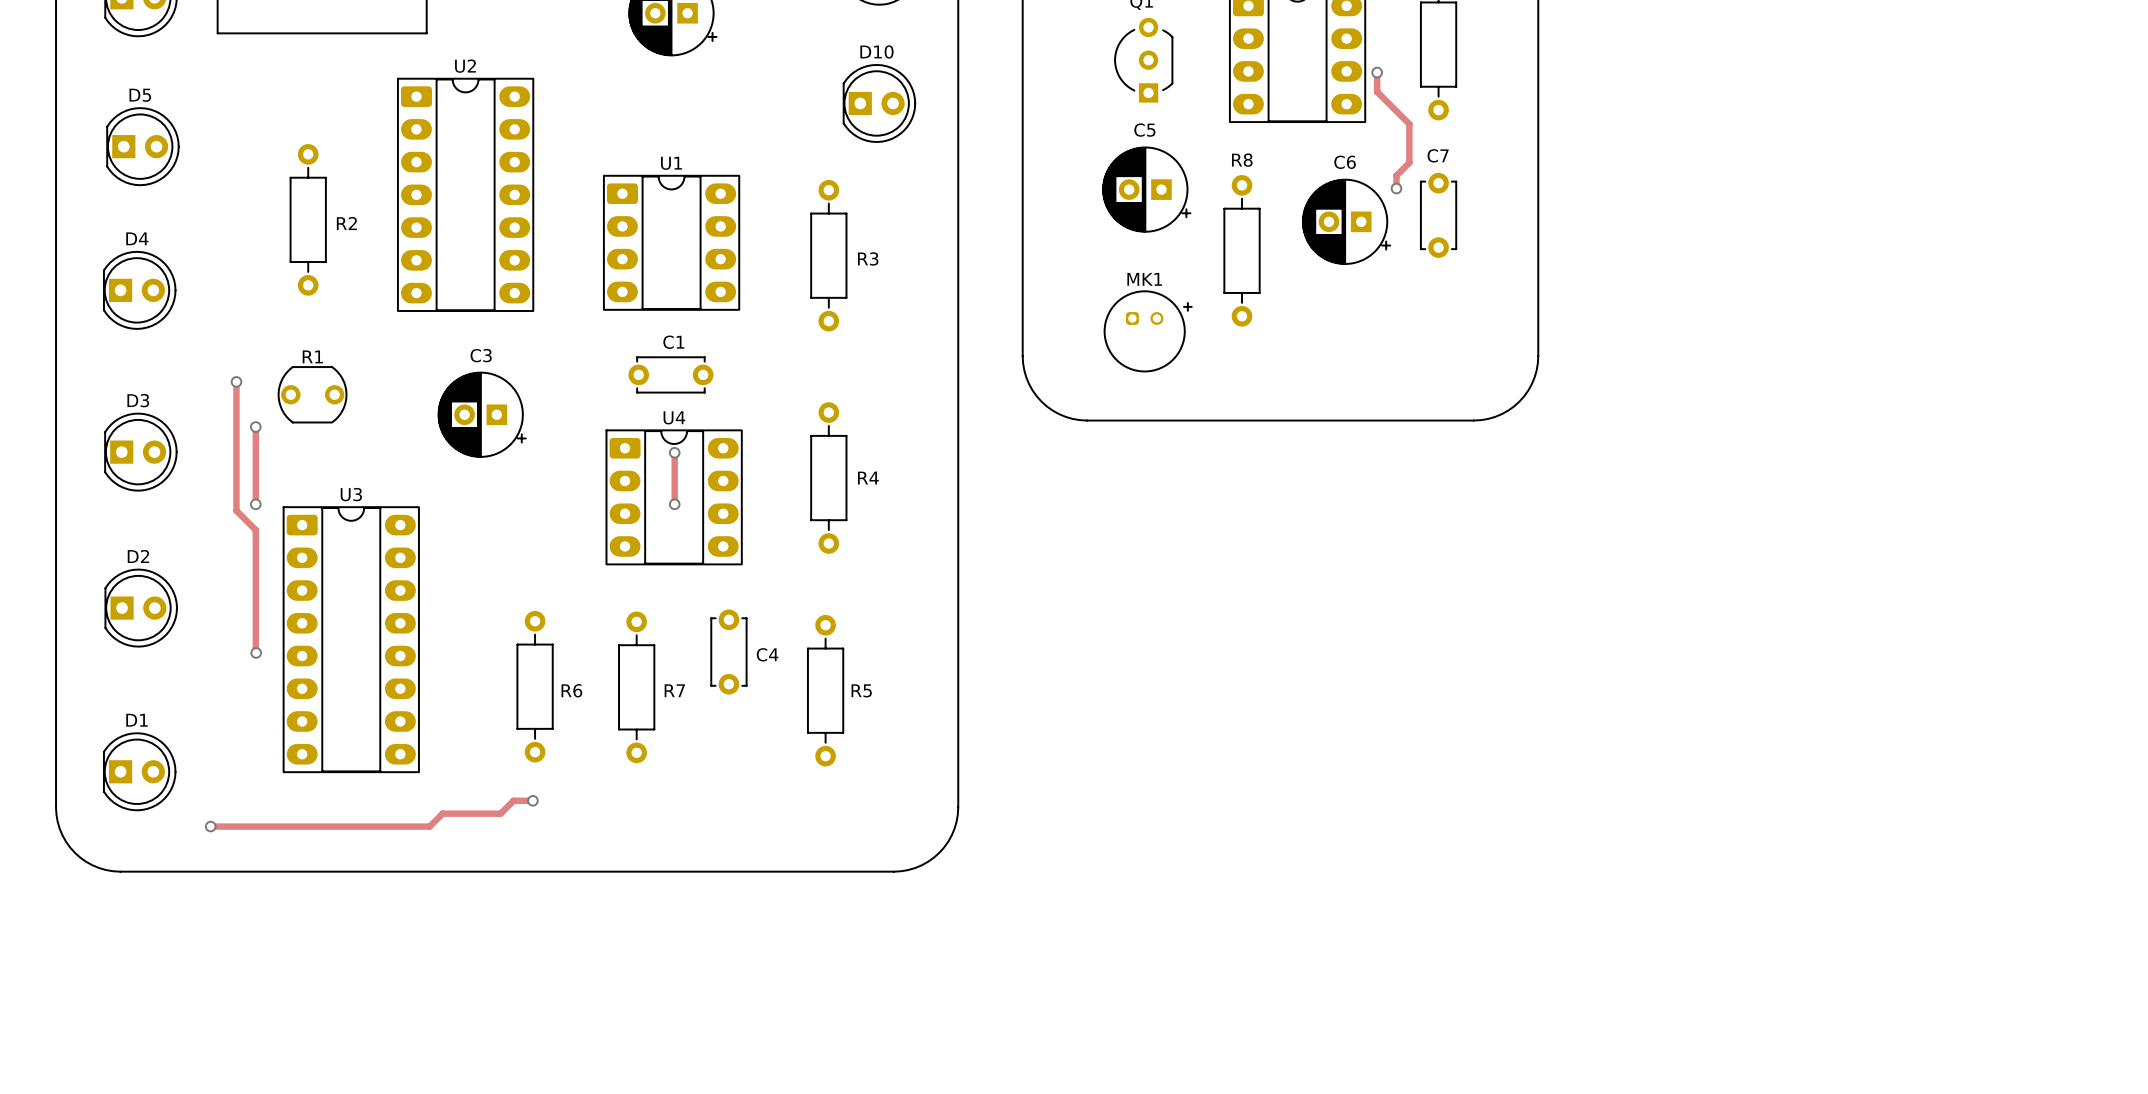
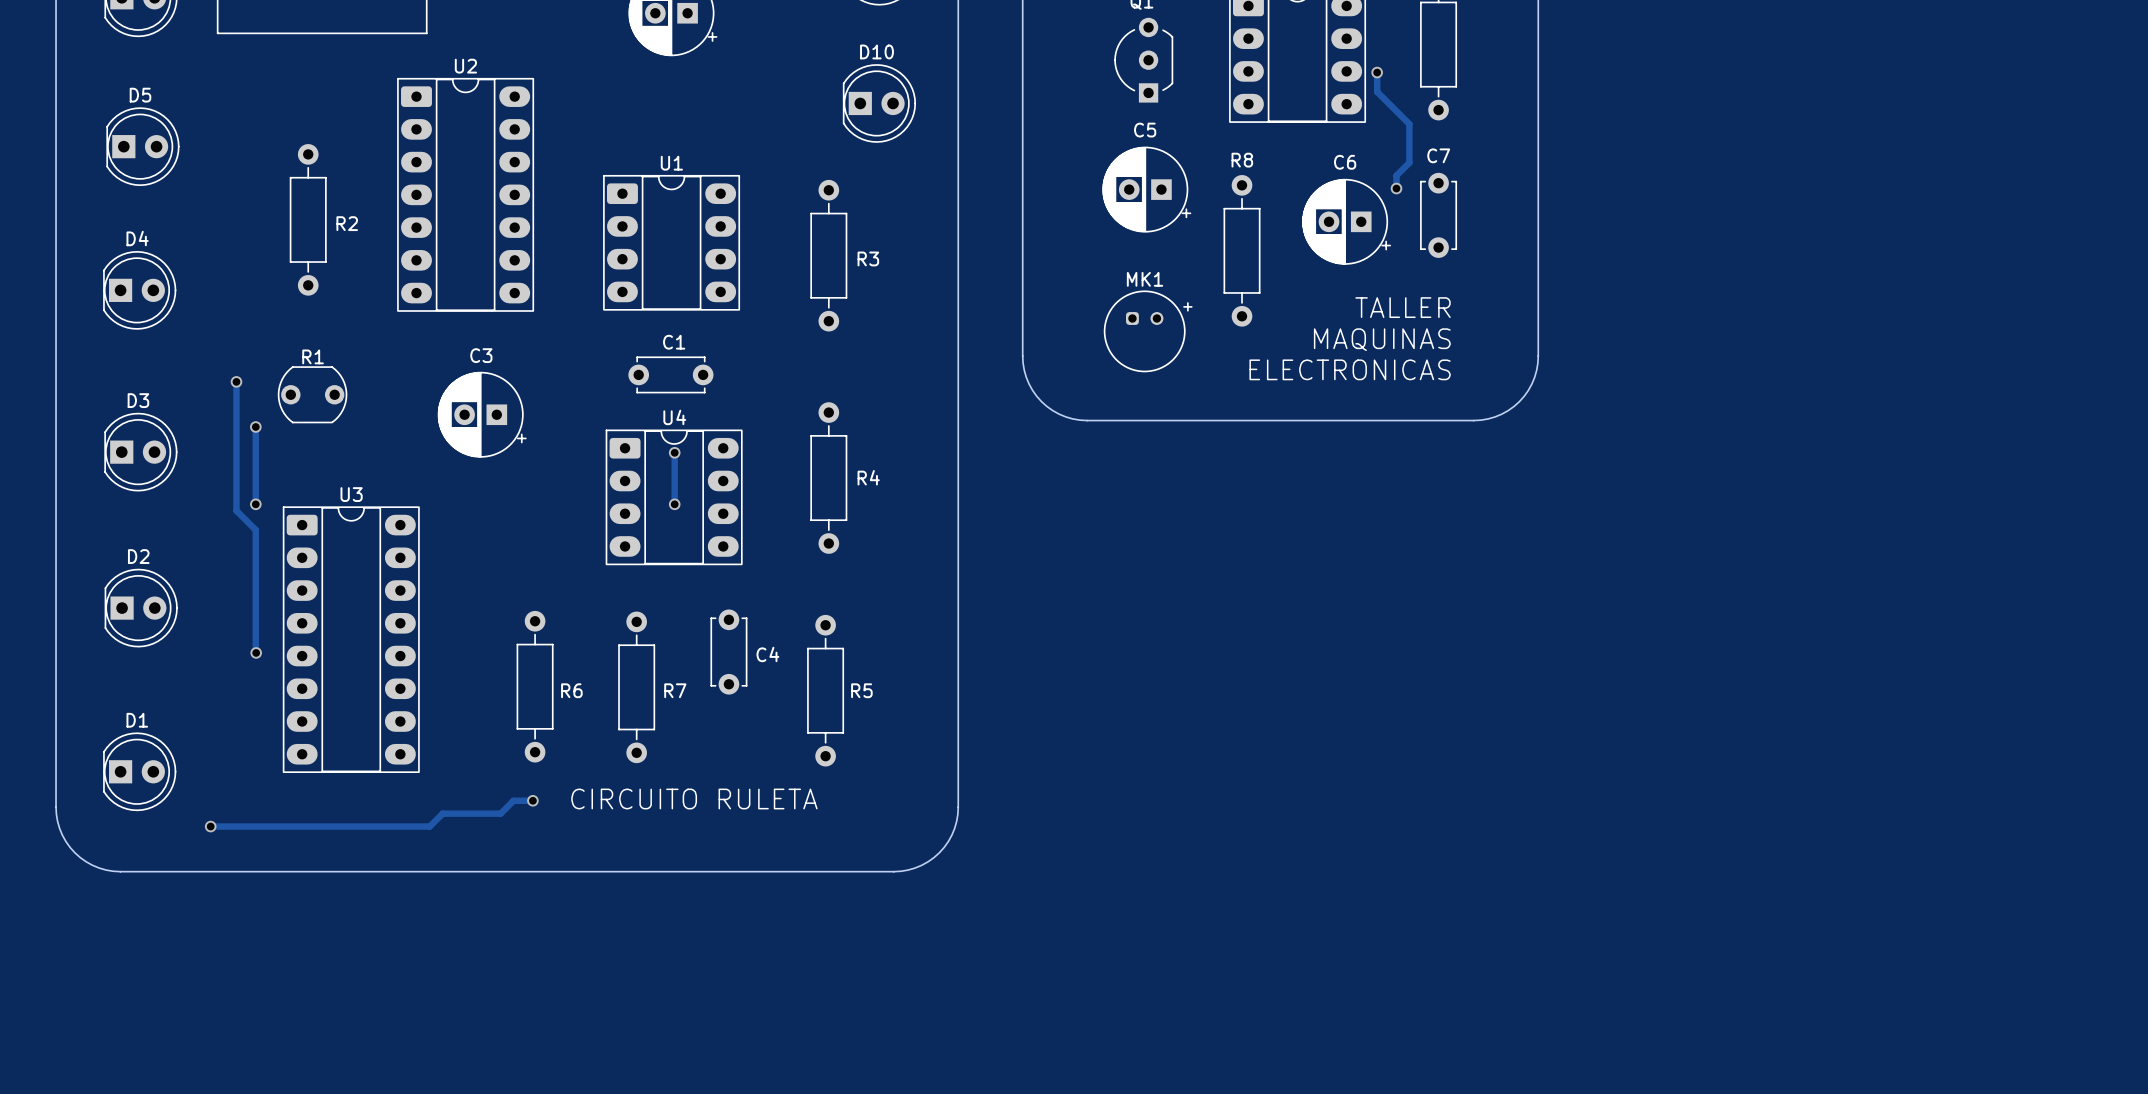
text: none -> TALLER (1403, 307)
text: none -> MAQUINAS (1382, 339)
text: none -> ELECTRONICAS (1350, 369)
text: none -> CIRCUITO RULETA (694, 798)

